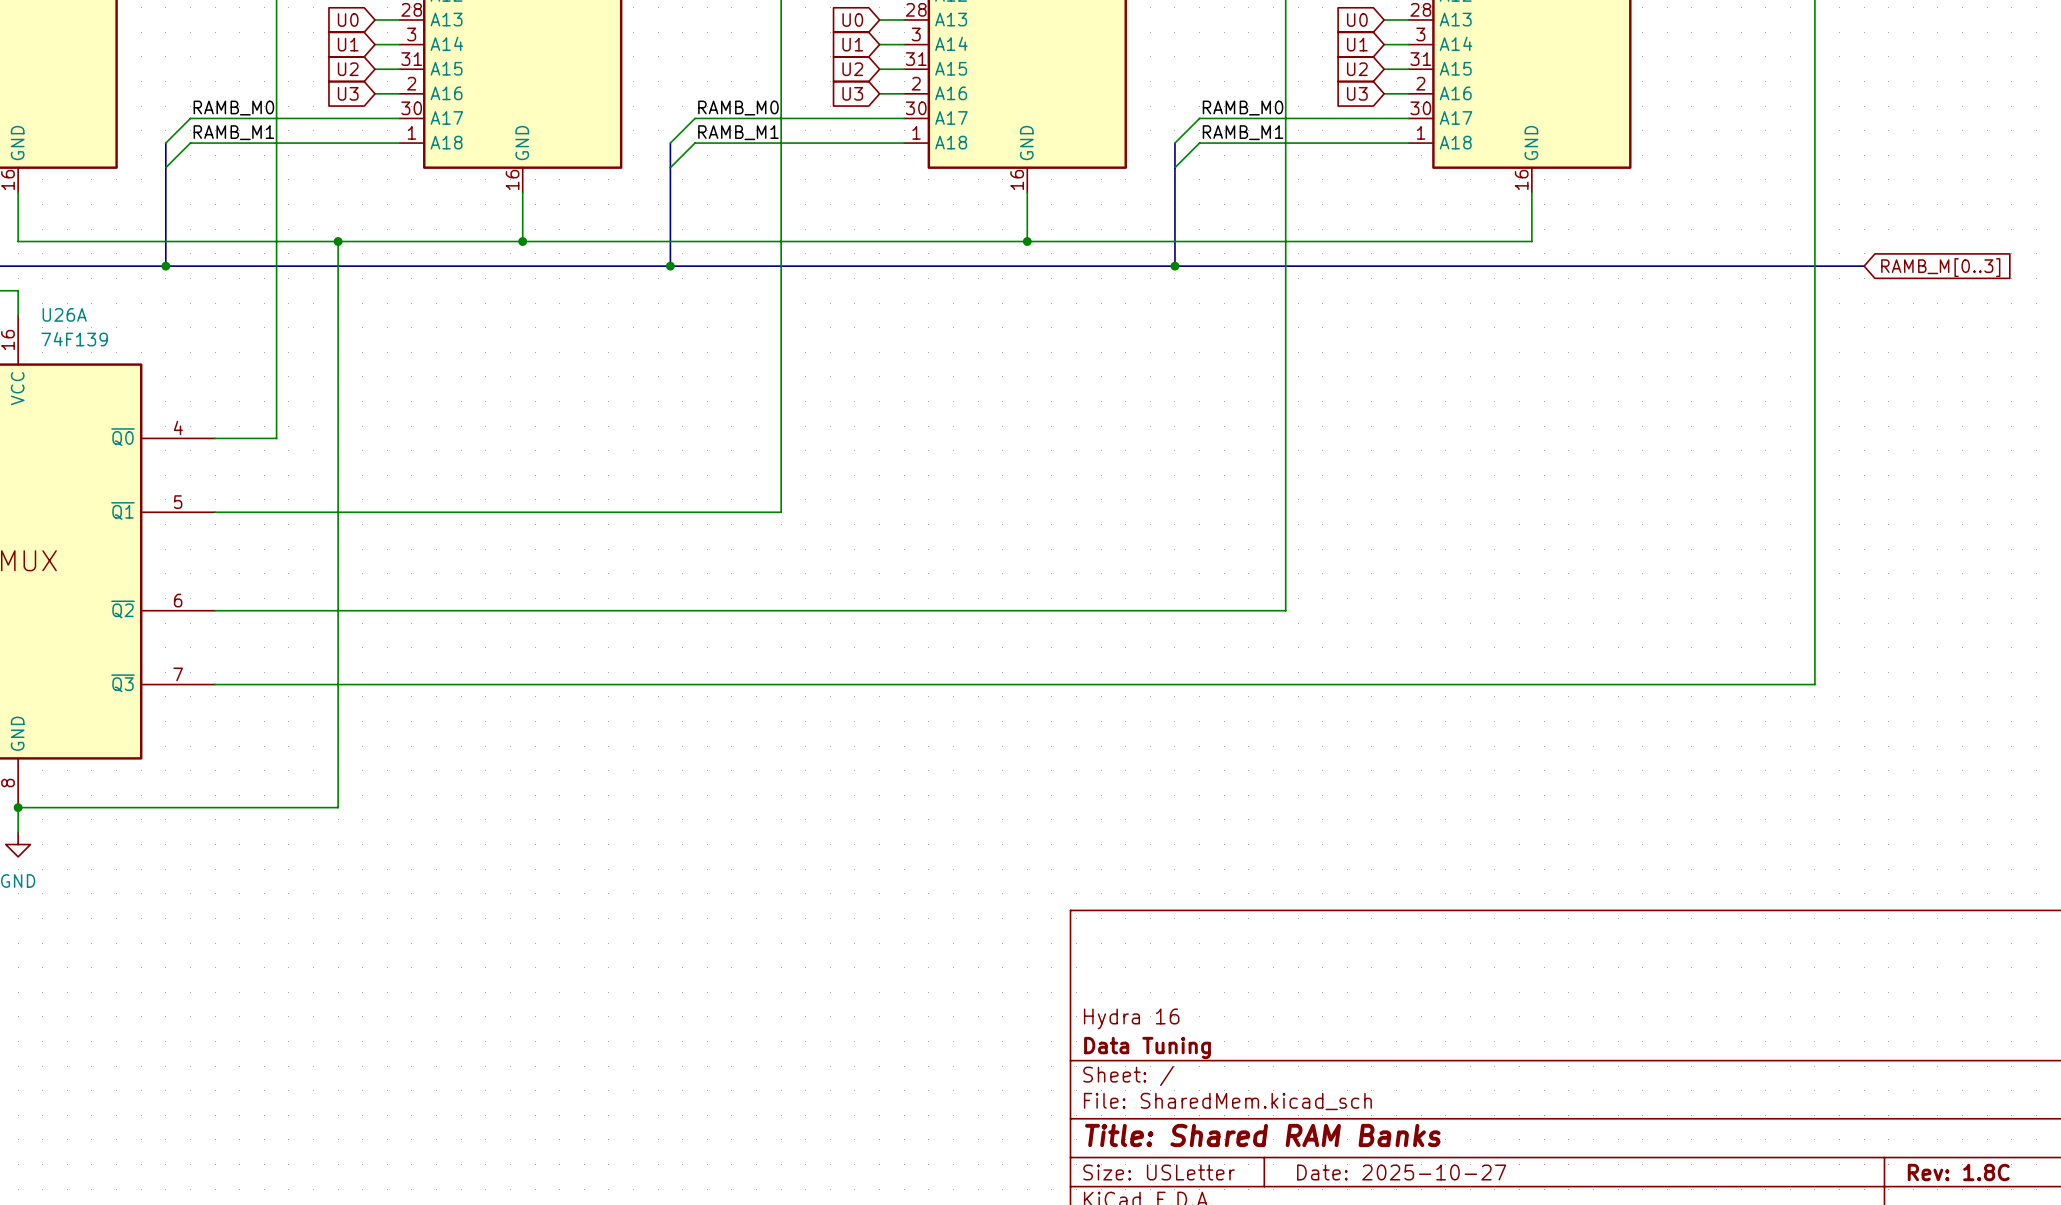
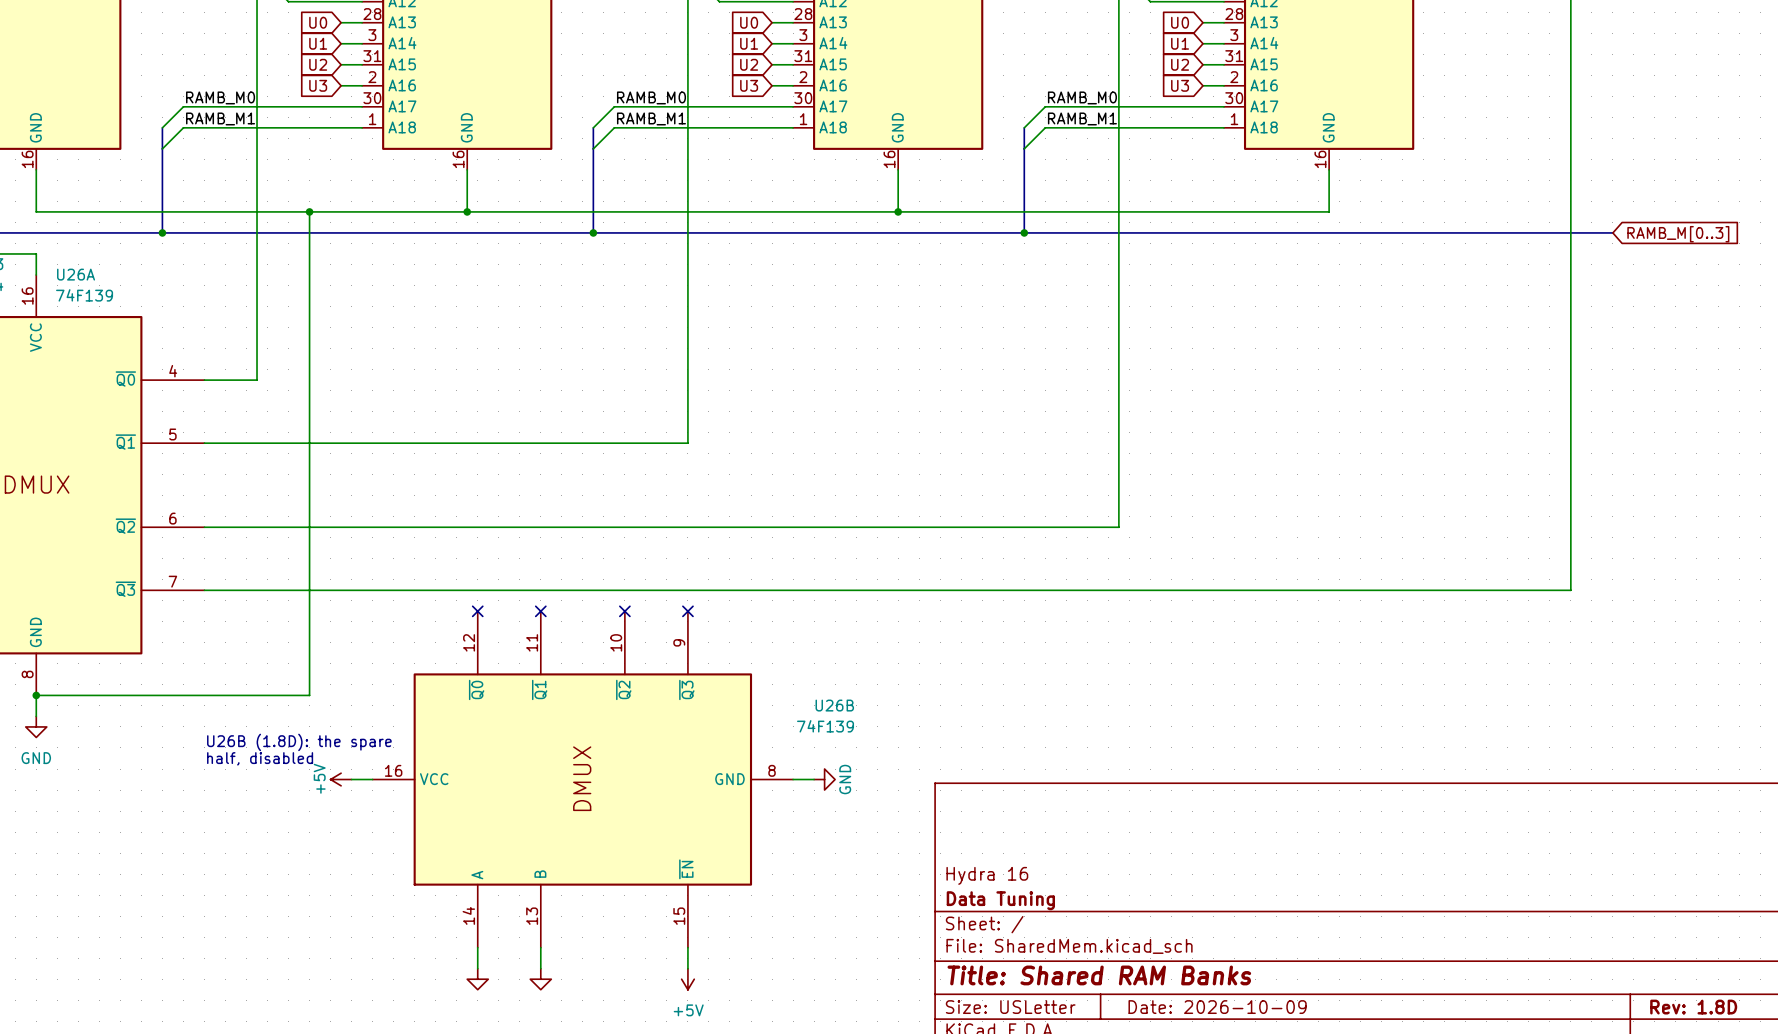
no-connect mark: none -> (477, 611)
no-connect mark: none -> (540, 611)
no-connect mark: none -> (624, 611)
no-connect mark: none -> (687, 611)
text: none -> U26B (1.8D): the spare (299, 742)
text: none -> half, disabled (260, 758)
power symbol: none -> +5V (341, 779)
wire: none -> (351, 779) (372, 779)
U26B: none -> 74F139 (582, 779)
wire: none -> (793, 779) (814, 779)
power symbol: none -> GND (824, 779)
wire: none -> (477, 947) (477, 968)
wire: none -> (540, 947) (540, 968)
wire: none -> (687, 947) (687, 968)
power symbol: none -> (477, 979)
power symbol: none -> (540, 979)
power symbol: none -> +5V (687, 979)
title block: Date: 2025-10-27 (1401, 1172) -> Date: 2026-10-09 (1217, 1007)
title block: Rev: 1.8C (1958, 1172) -> Rev: 1.8D (1693, 1007)

